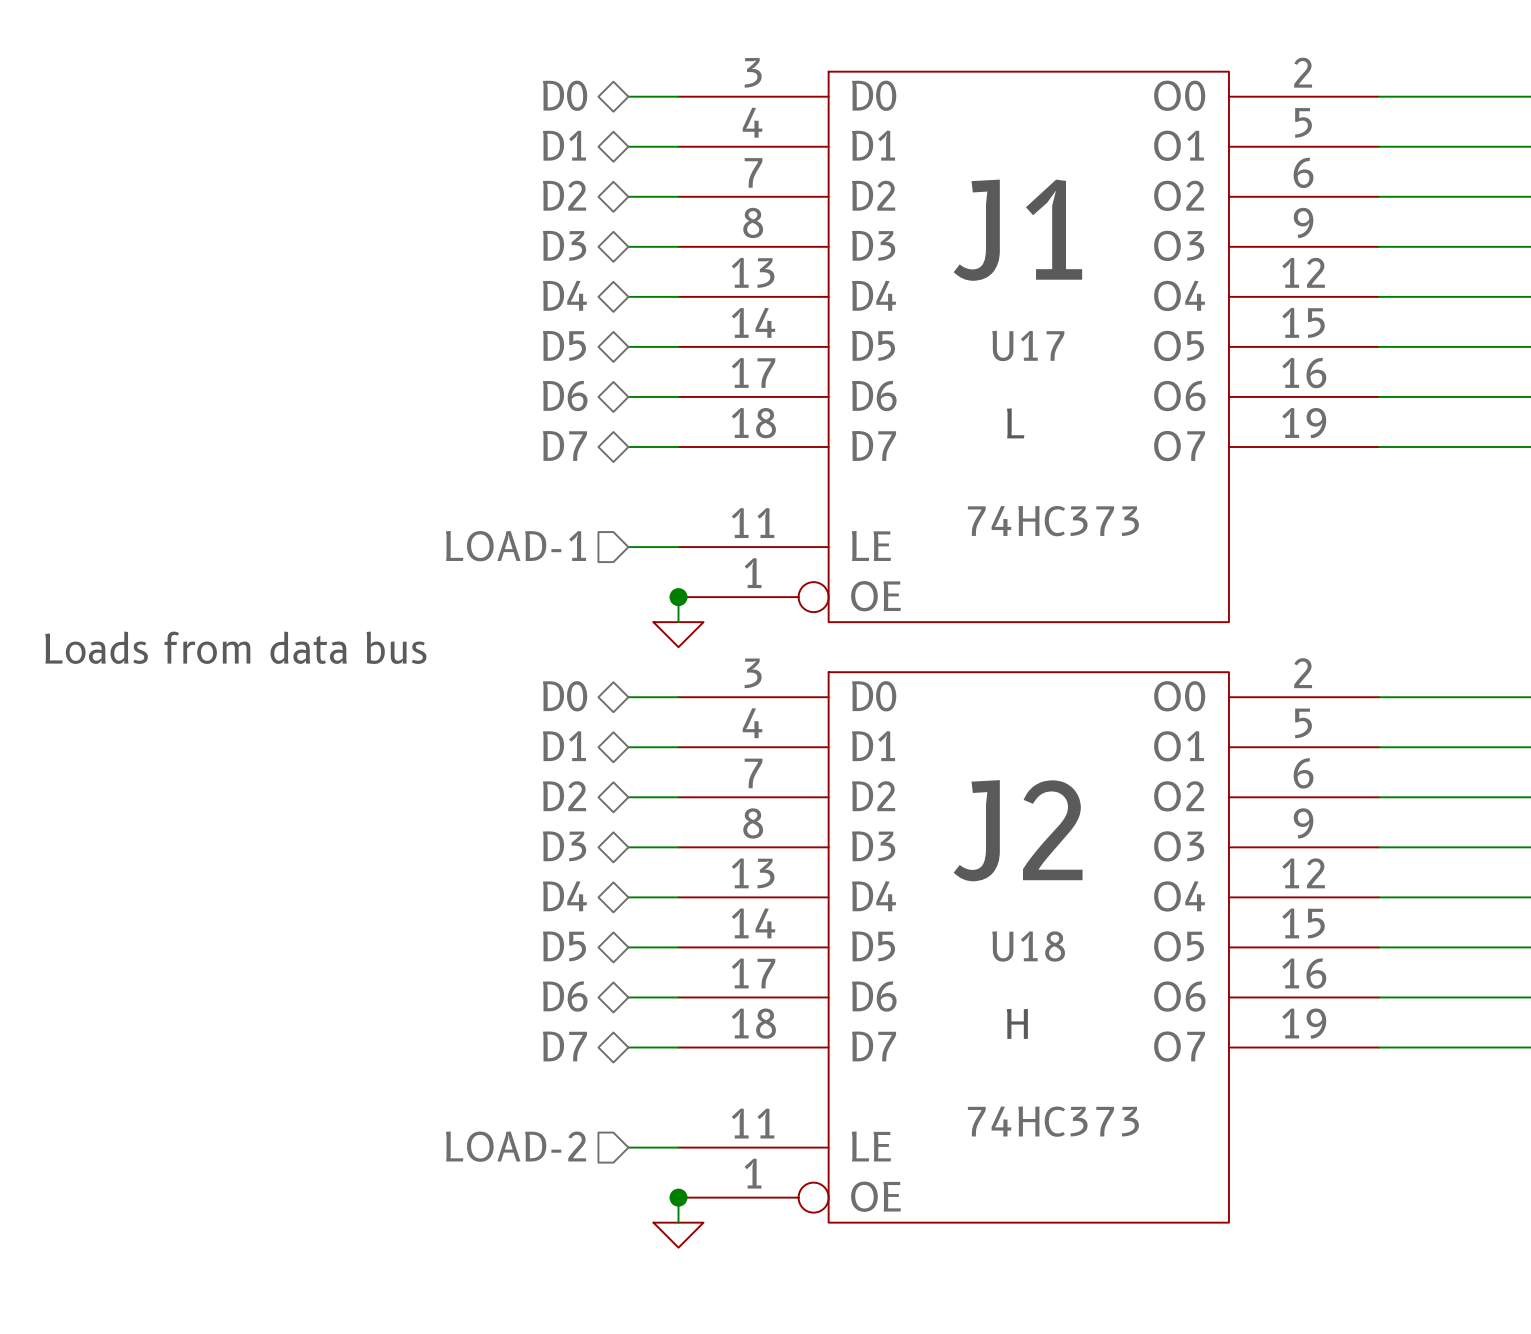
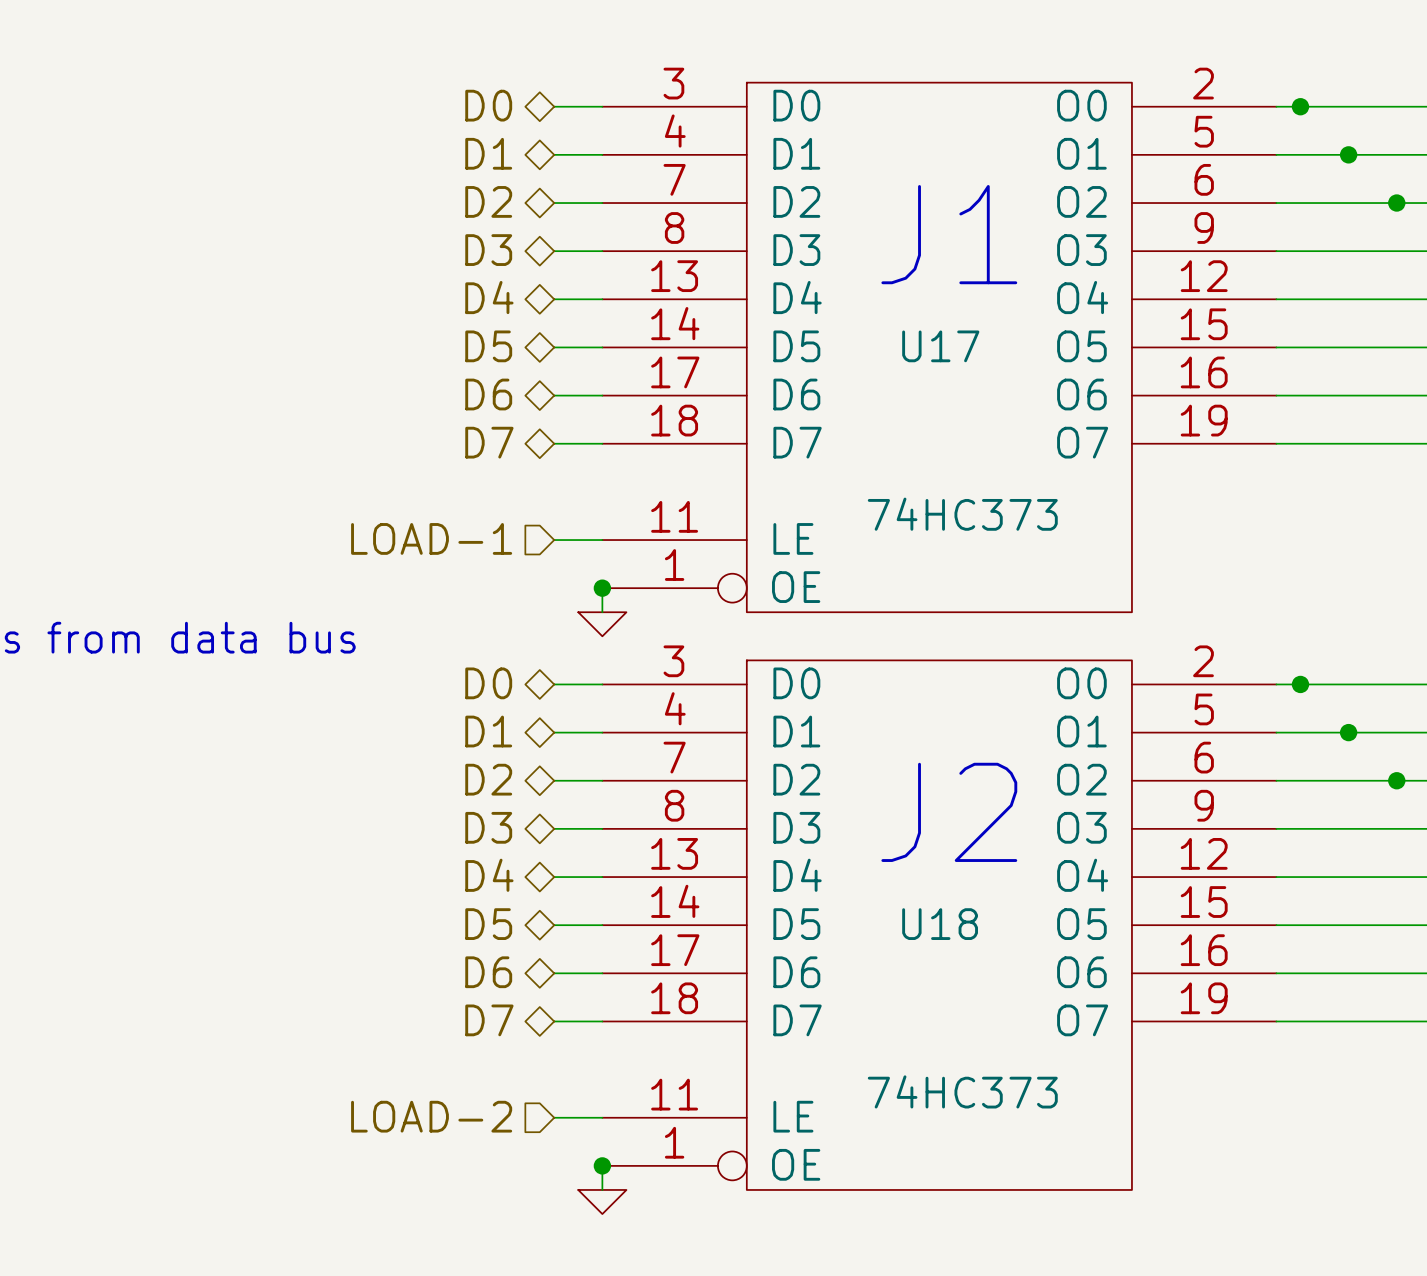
junction: none -> (1300, 106)
junction: none -> (1348, 154)
junction: none -> (1396, 203)
text: L (1015, 423) -> none
junction: none -> (1300, 684)
junction: none -> (1348, 732)
junction: none -> (1396, 780)
text: H (1017, 1023) -> none

